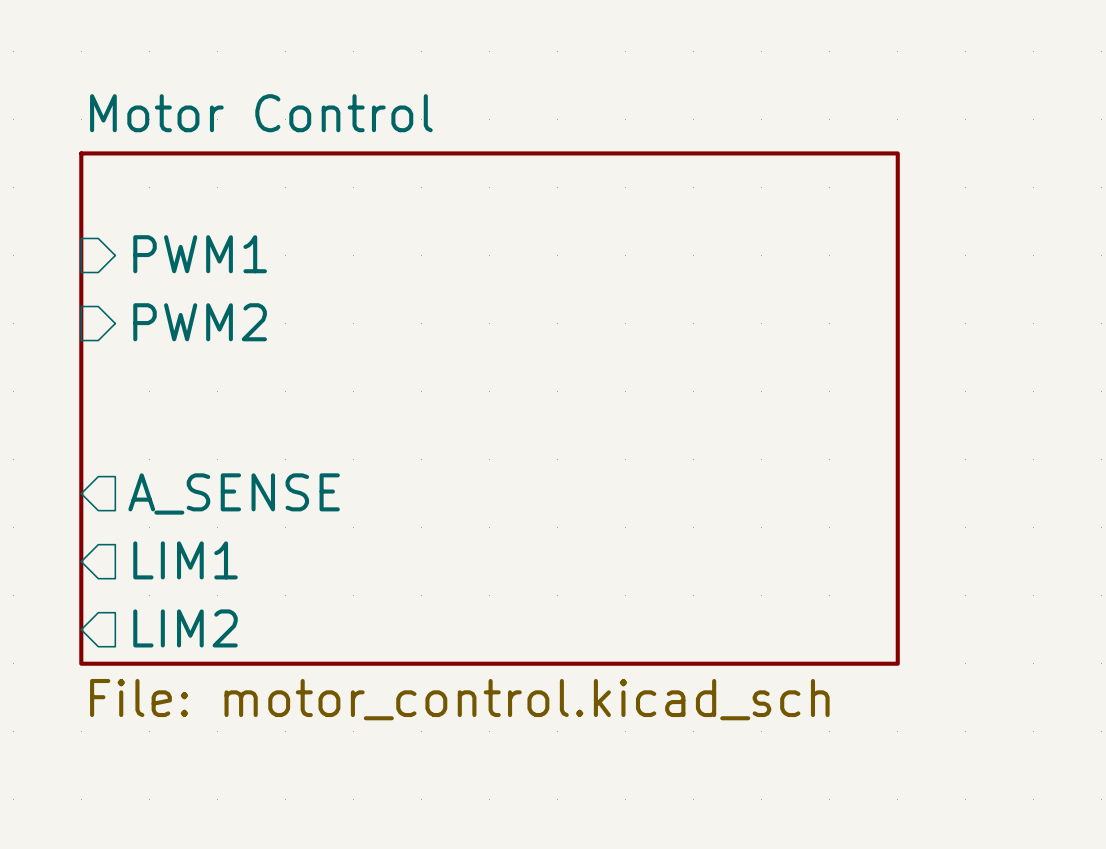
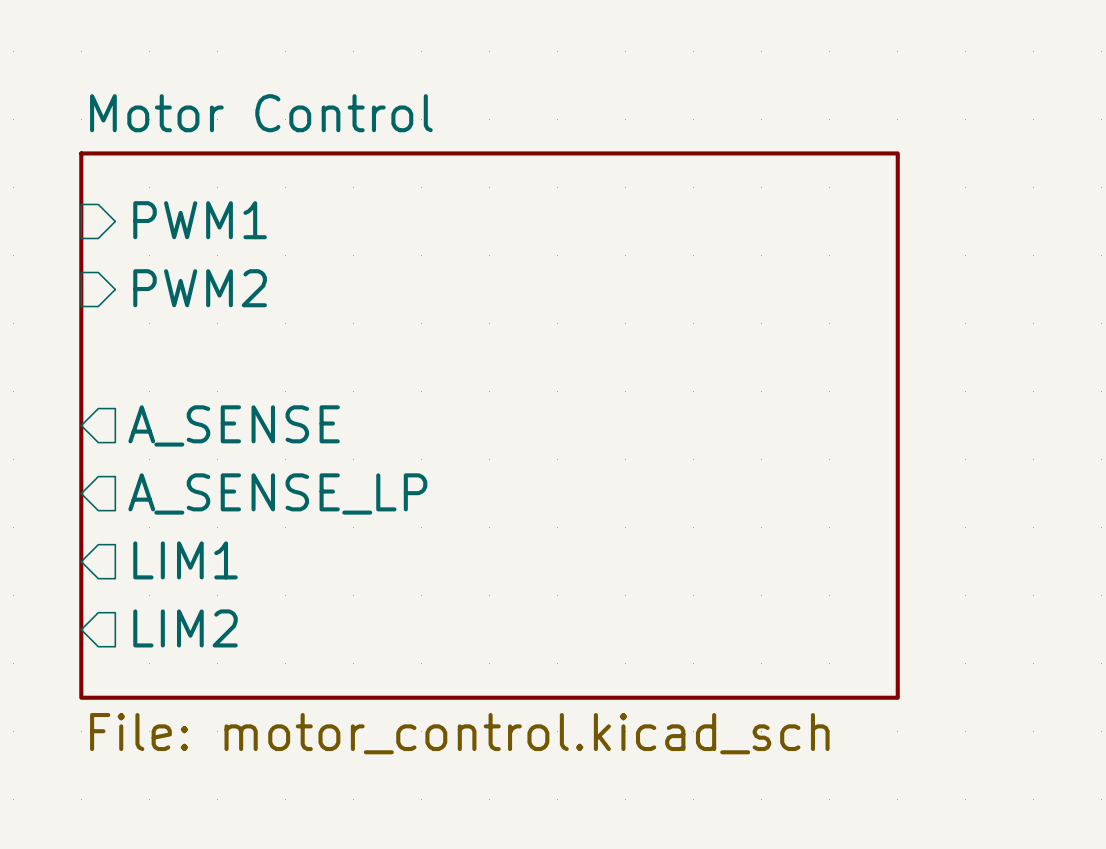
sheet Motor Control shape: [79, 151, 900, 666] -> [79, 151, 900, 700]
sheet pin position: PWM1 (200, 254) -> PWM1 (200, 220)
sheet pin position: PWM2 (200, 322) -> PWM2 (200, 288)
sheet pin: none -> A_SENSE (234, 425)
sheet pin: A_SENSE (234, 493) -> A_SENSE_LP (277, 493)

